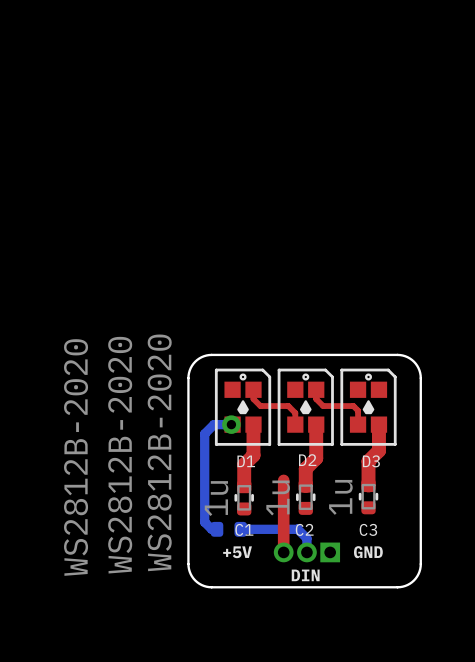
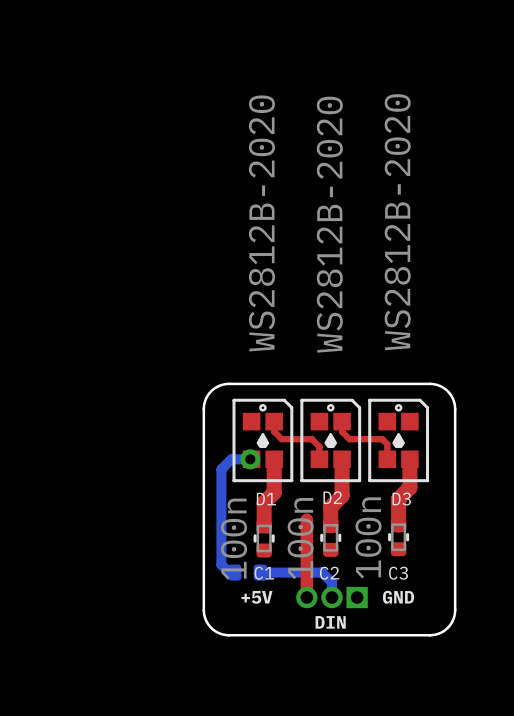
D1 value position: WS2812B-2020 (159, 452) -> WS2812B-2020 (329, 224)
D2 value position: WS2812B-2020 (120, 455) -> WS2812B-2020 (261, 223)
D3 value position: WS2812B-2020 (76, 457) -> WS2812B-2020 (397, 222)
C2 value: 1u (278, 497) -> 100n (300, 538)
C3 value: 1u (340, 497) -> 100n (368, 537)
C1 value: 1u (216, 498) -> 100n (234, 539)

